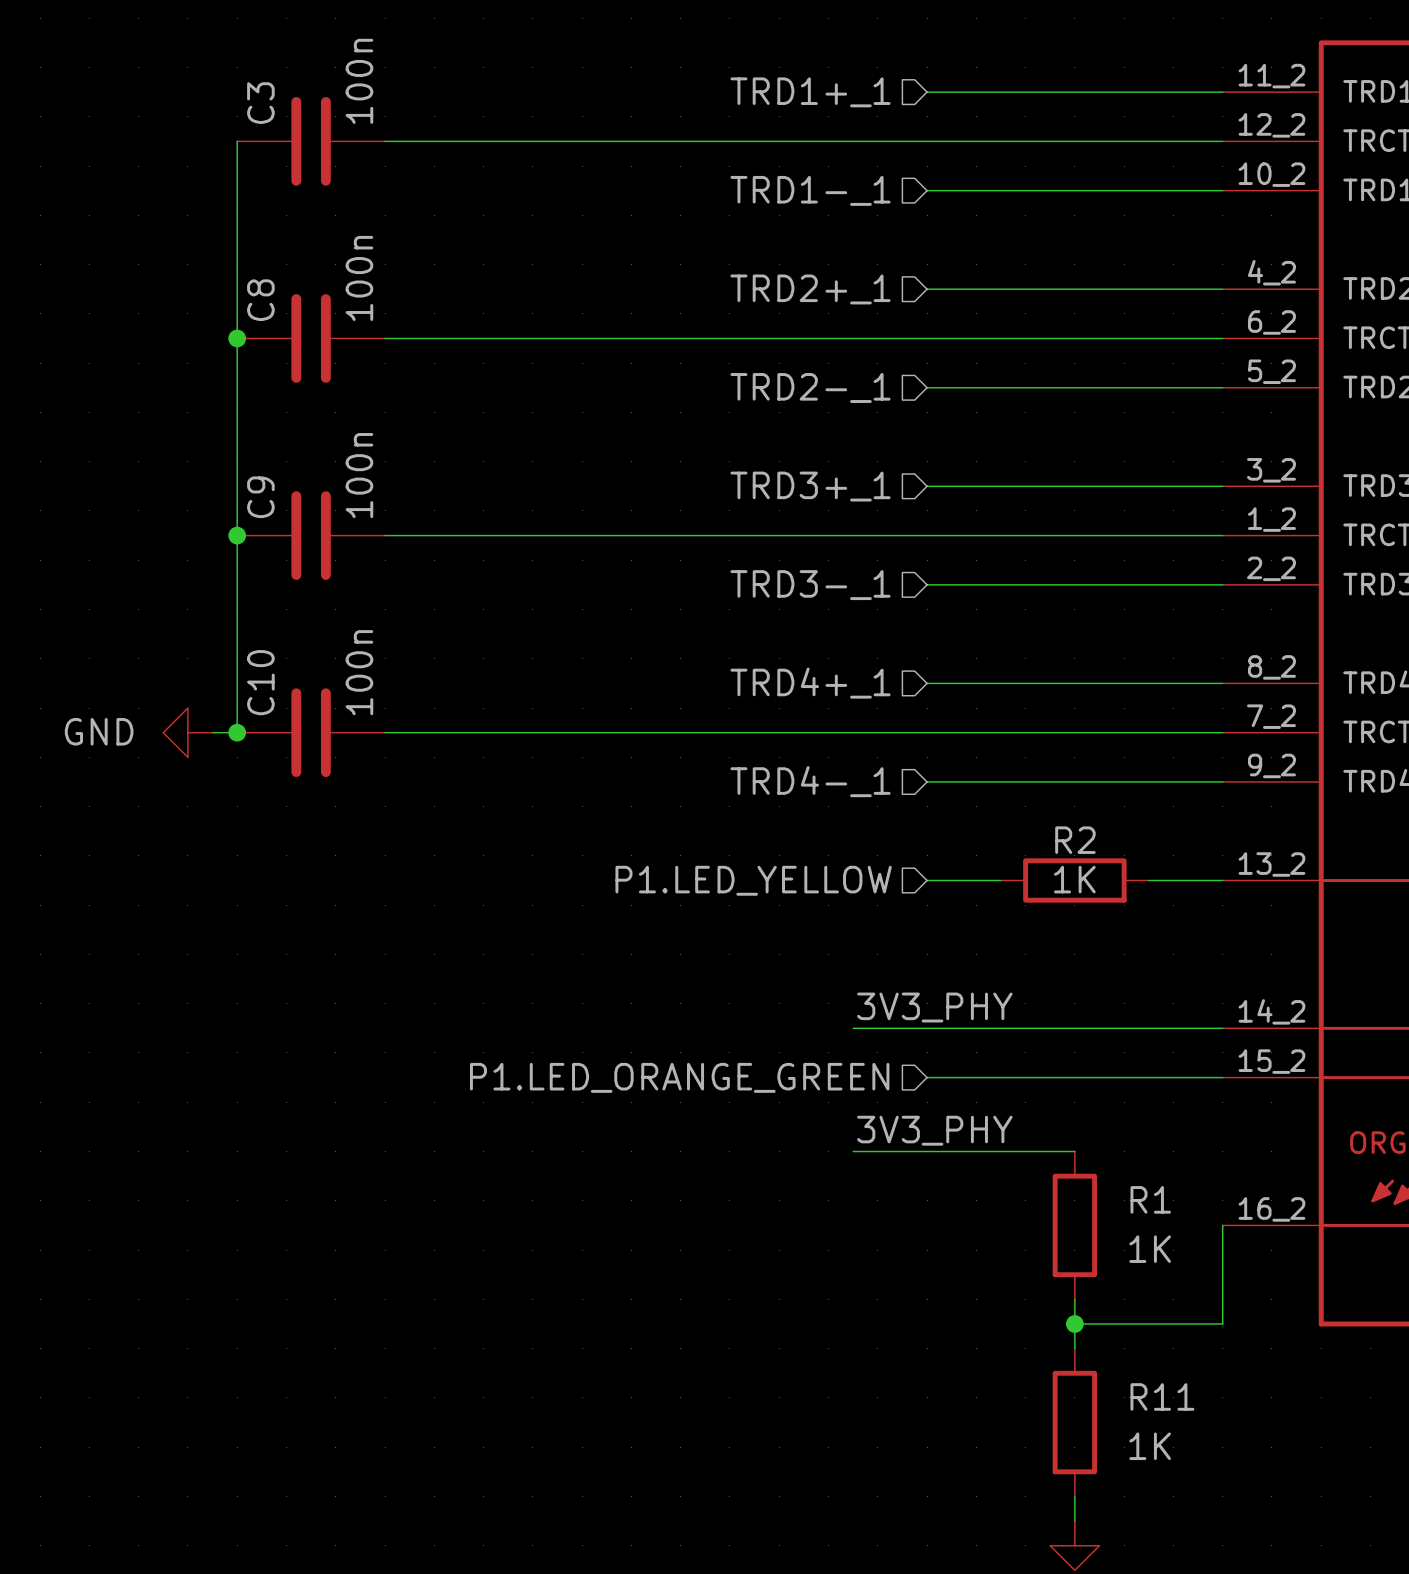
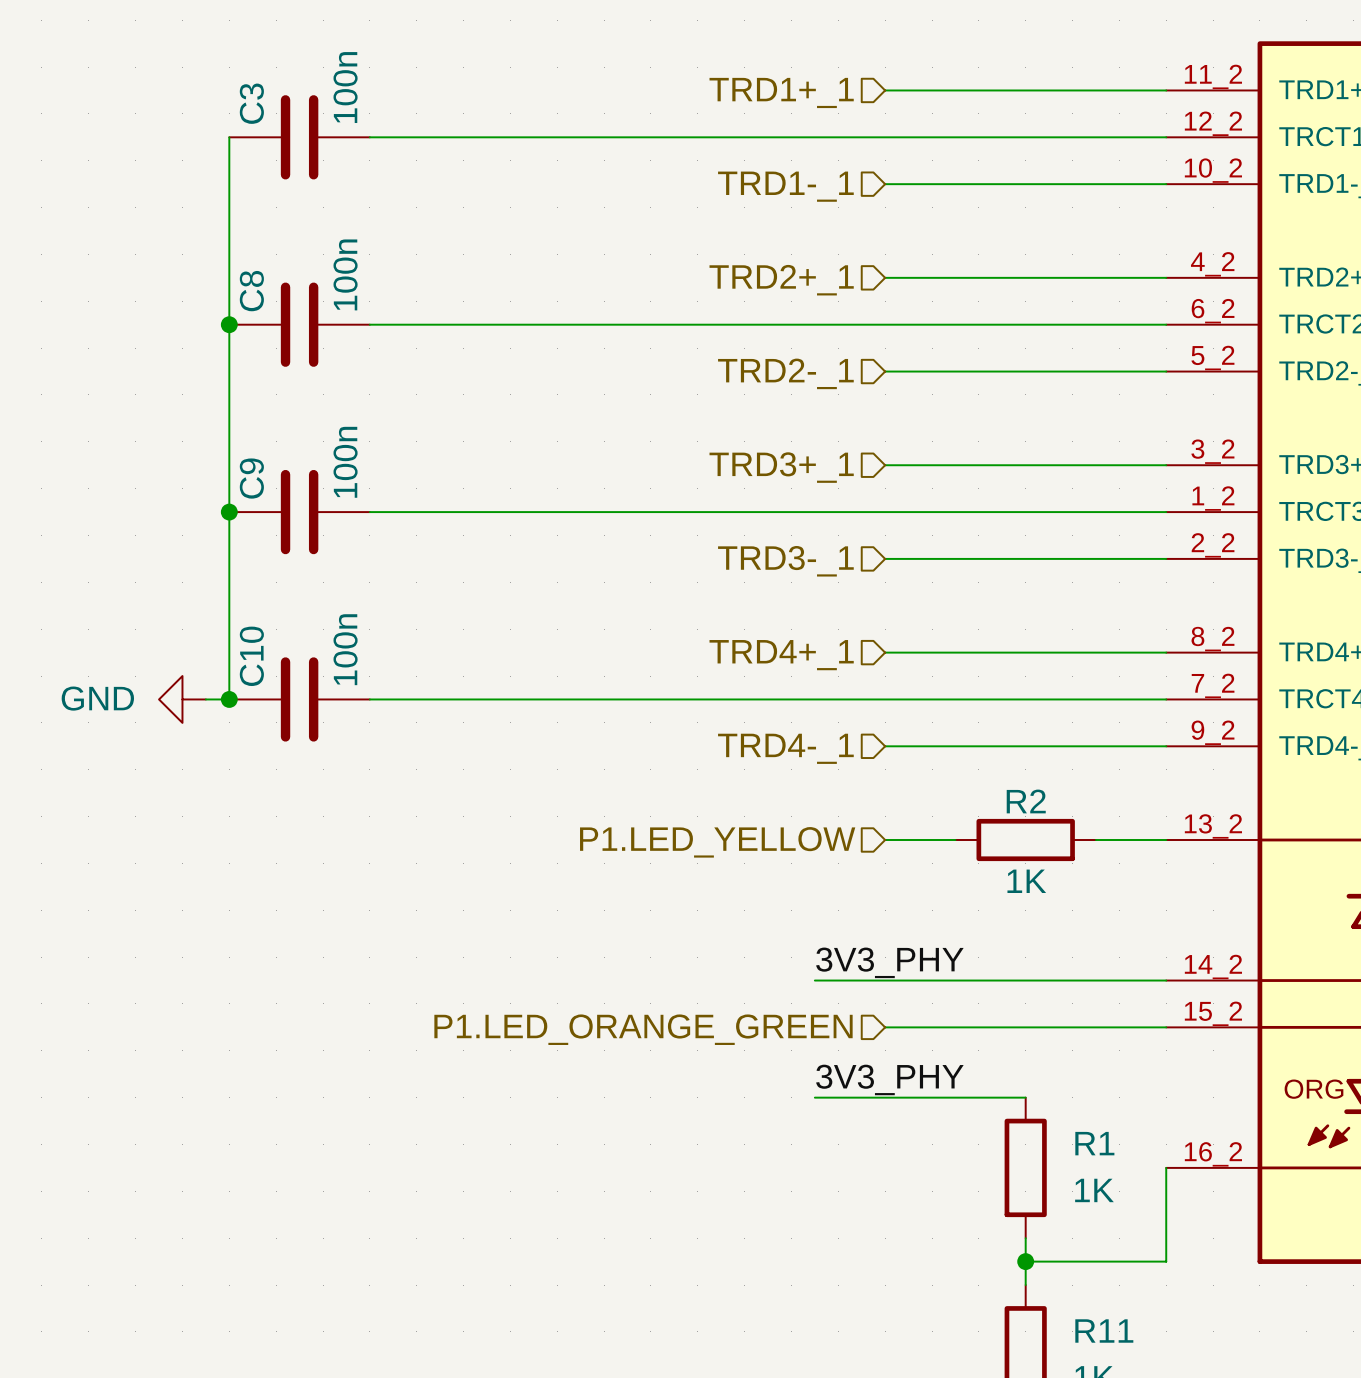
R2 value position: 1K (1074, 879) -> 1K (1026, 881)

